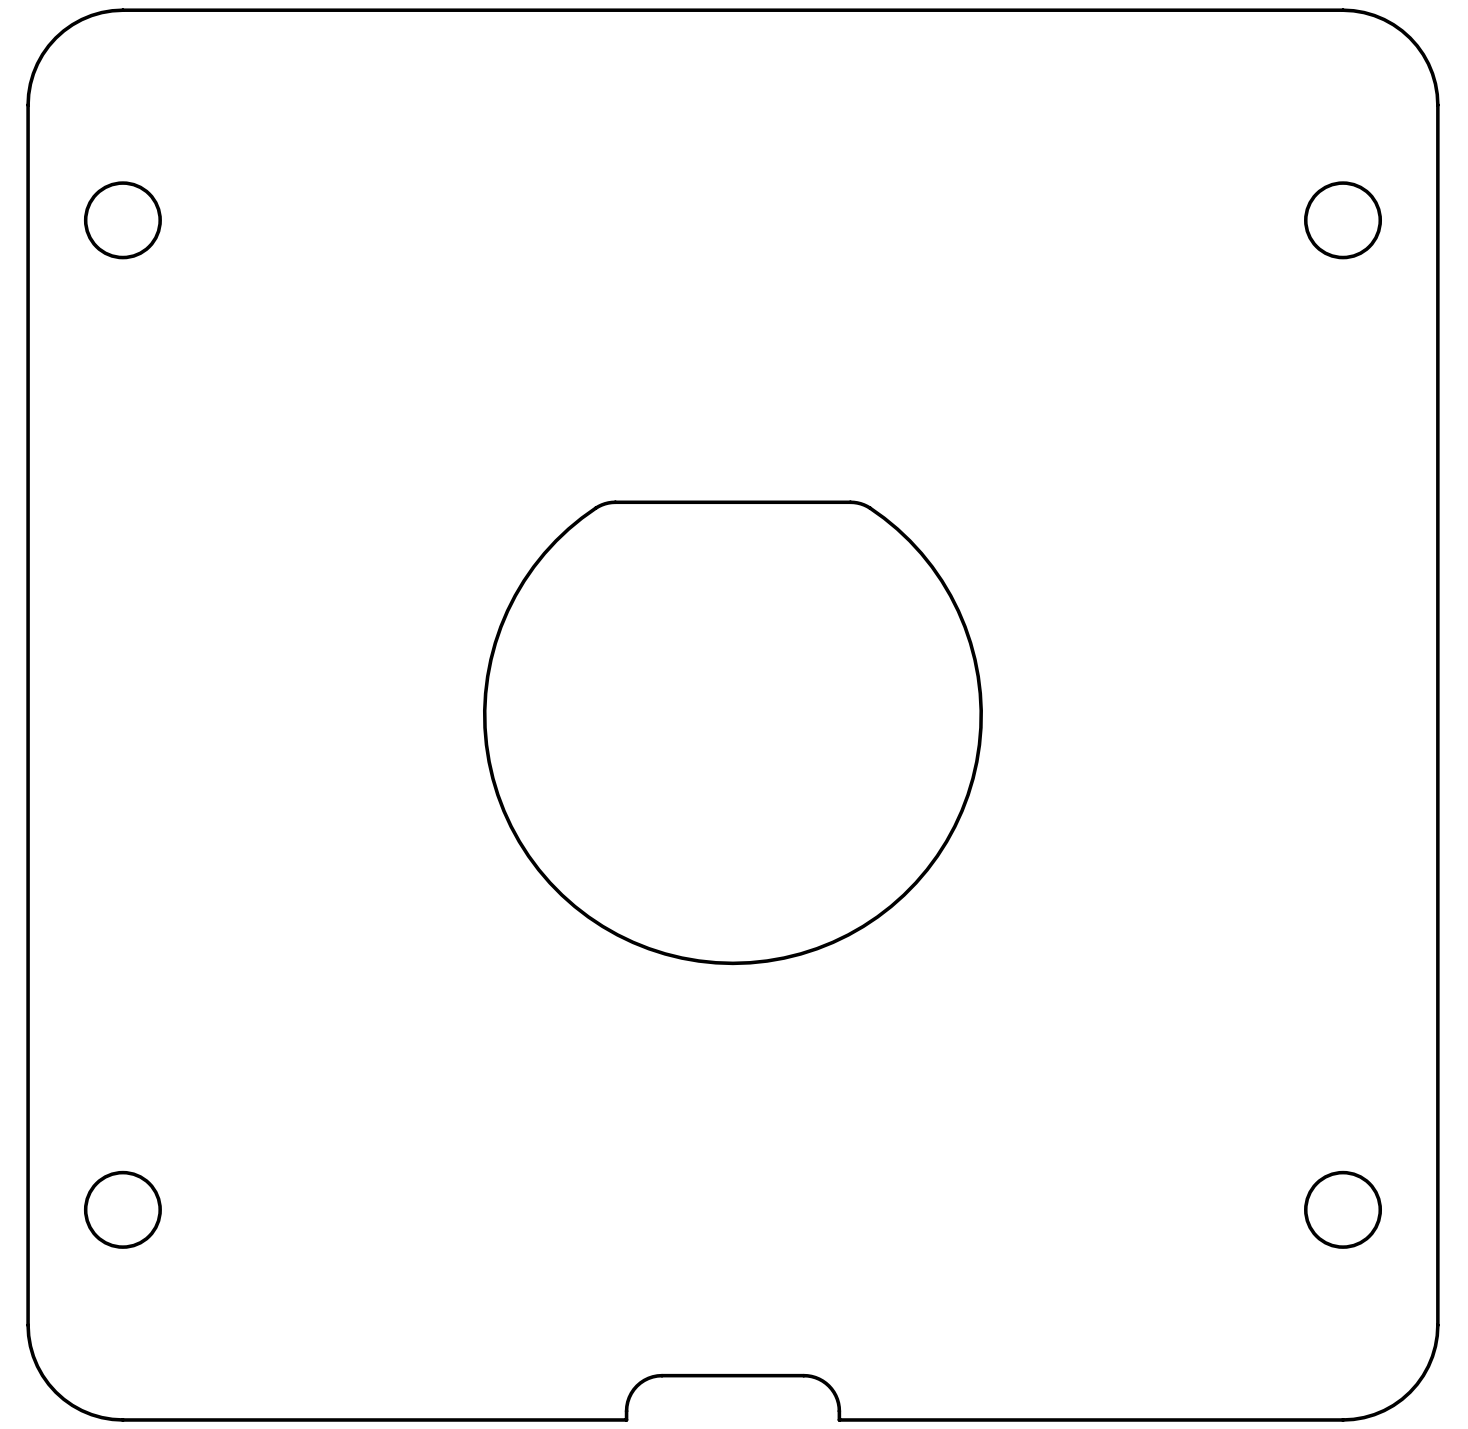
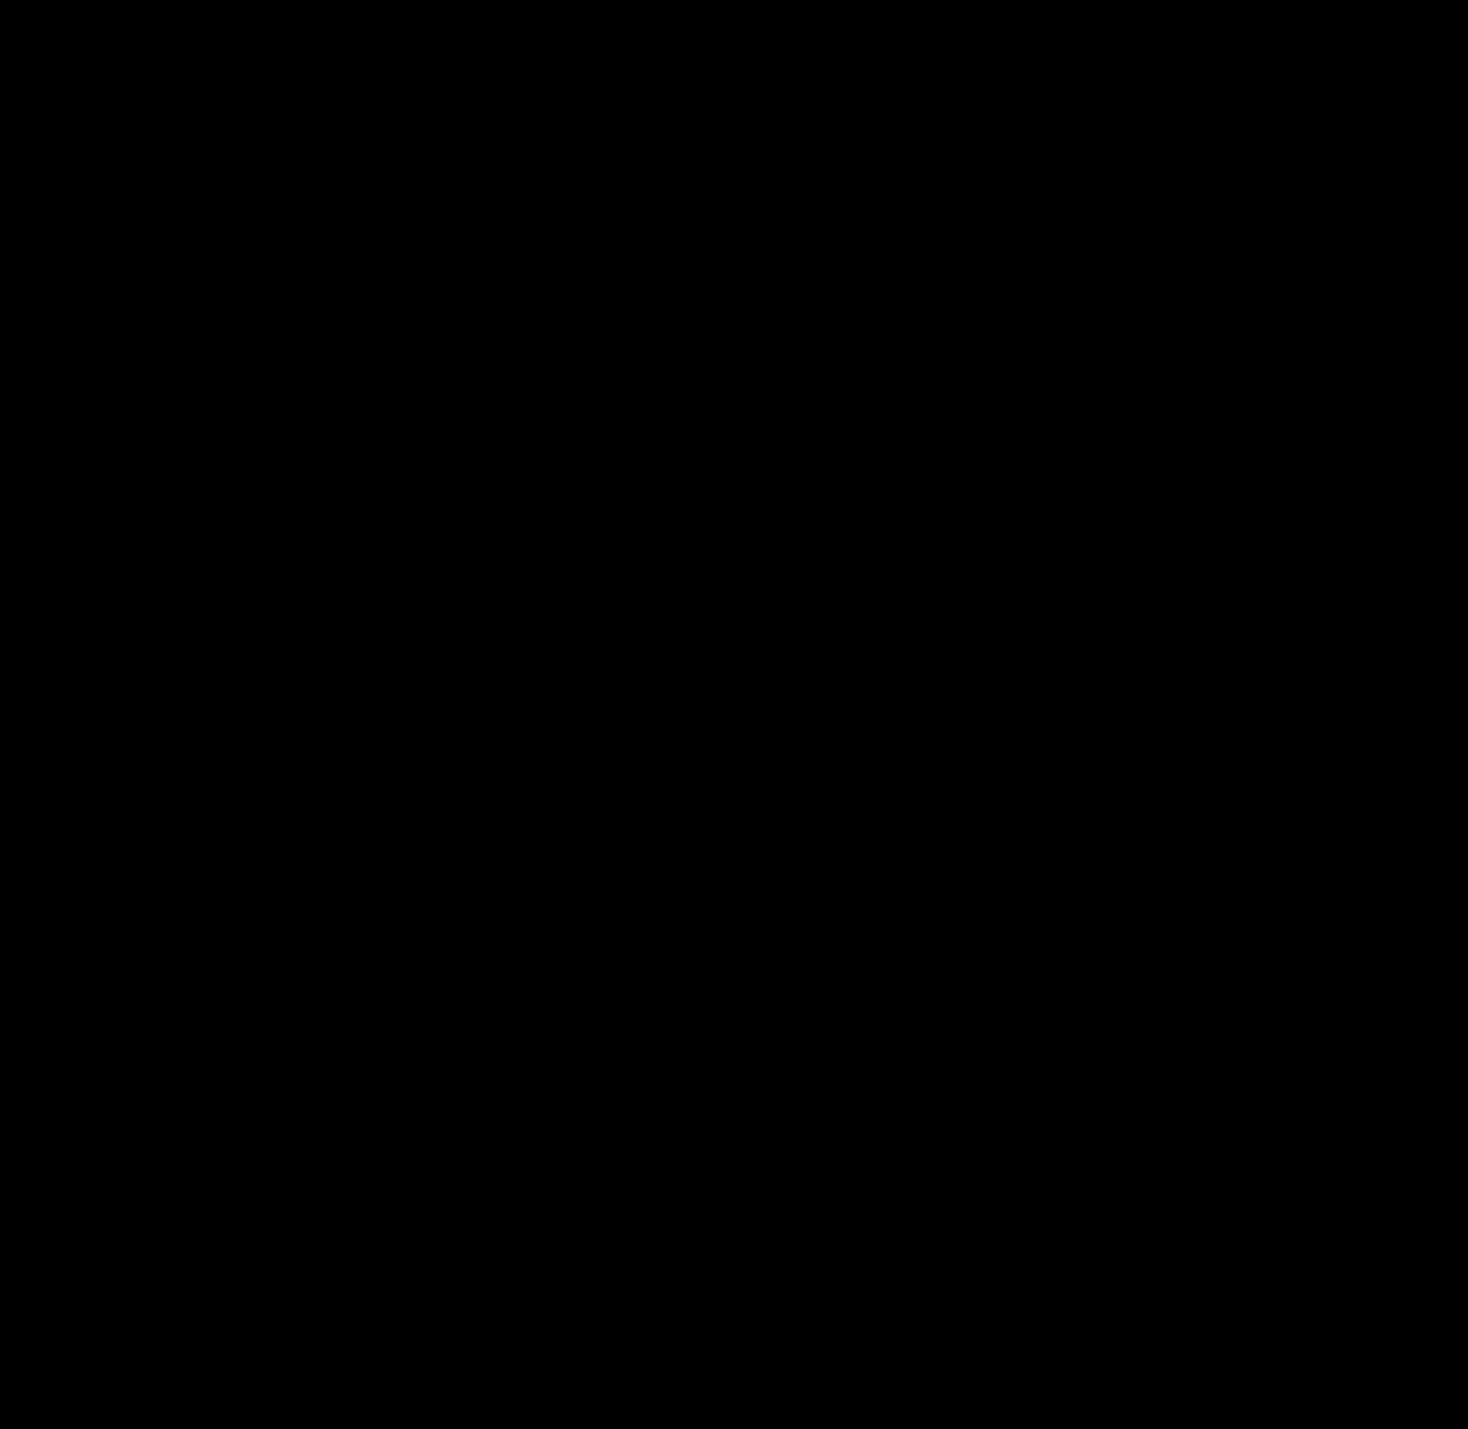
board edge: (1343, 10) (122, 10) (101, 12) (81, 19) (55, 37) (42, 54) (33, 73) (28, 105) (28, 1325) (33, 1356) (42, 1375) (55, 1392) (81, 1410) (101, 1417) (122, 1419) (626, 1419) (626, 1406) (631, 1393) (640, 1382) (652, 1376) (803, 1375) (819, 1379) (831, 1388) (838, 1403) (839, 1419) (1343, 1419) (1374, 1414) (1393, 1405) (1410, 1392) (1423, 1375) (1432, 1356) (1437, 1325) (1437, 105) (1432, 73) (1423, 54) (1410, 37) (1393, 24) (1374, 15) (1343, 10) -> none
round board edge: [83, 181, 162, 260] -> none
round board edge: [1304, 181, 1383, 260] -> none
board edge: (850, 502) (605, 503) (581, 518) (556, 540) (533, 566) (515, 595) (495, 643) (487, 676) (485, 727) (492, 778) (511, 826) (538, 869) (574, 906) (617, 934) (665, 953) (715, 962) (767, 961) (817, 948) (863, 926) (891, 906) (927, 869) (954, 826) (968, 794) (979, 744) (980, 693) (970, 643) (950, 595) (921, 553) (884, 518) (867, 506) (850, 502) -> none
round board edge: [83, 1170, 162, 1249] -> none
round board edge: [1304, 1170, 1383, 1249] -> none

